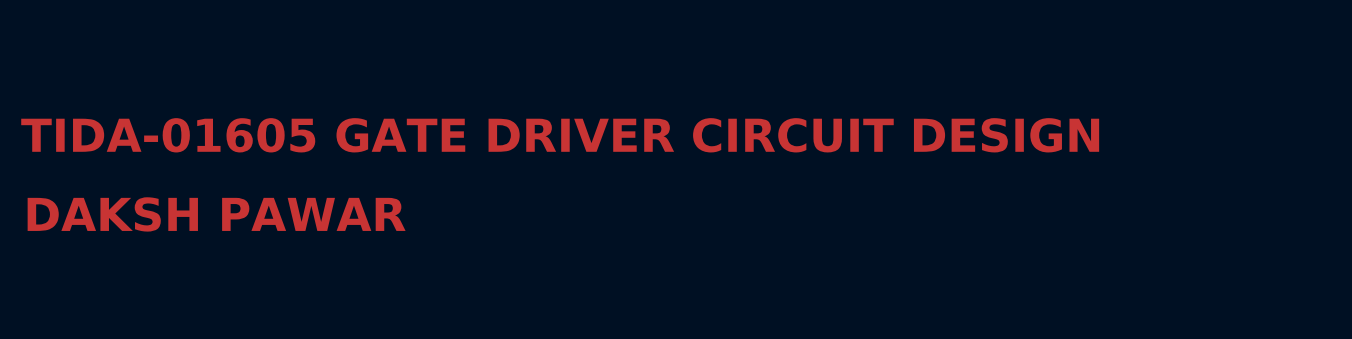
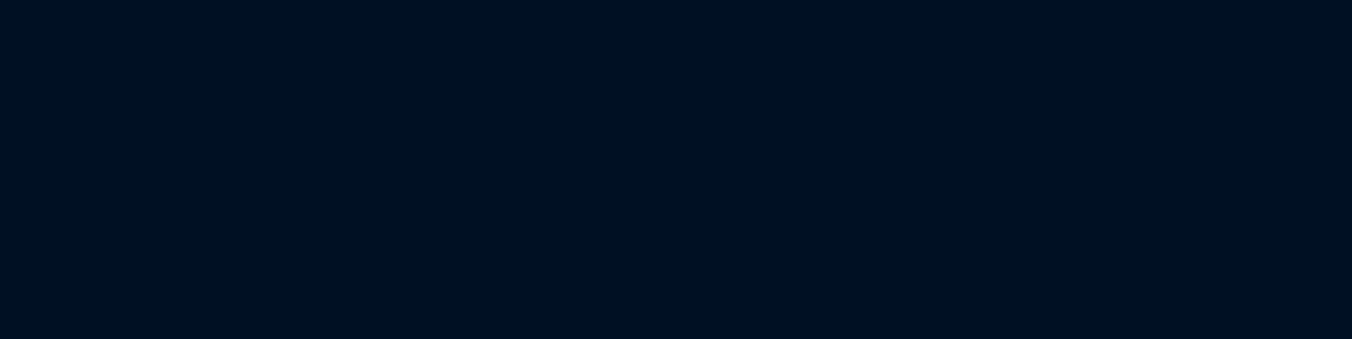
text: TIDA-01605 GATE DRIVER CIRCUIT DESIGN (560, 135) -> none
text: DAKSH PAWAR (216, 214) -> none

